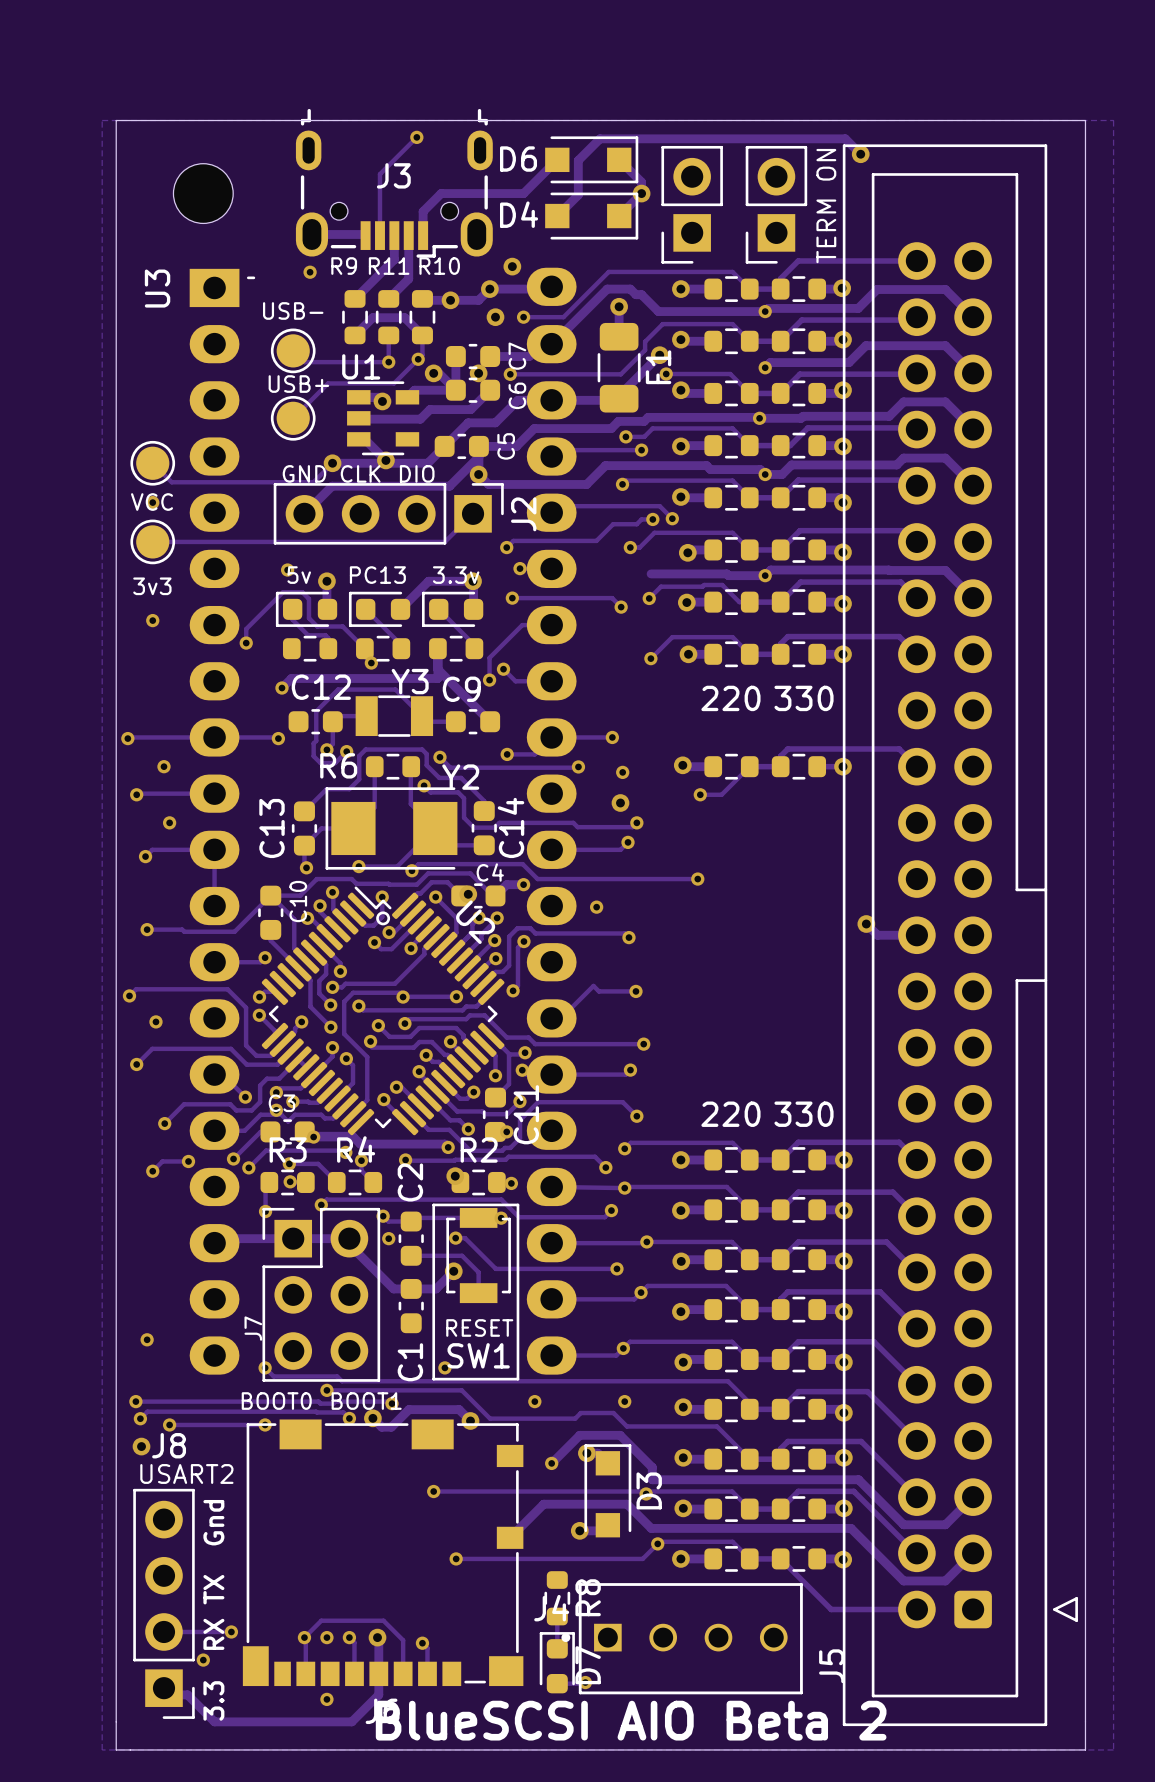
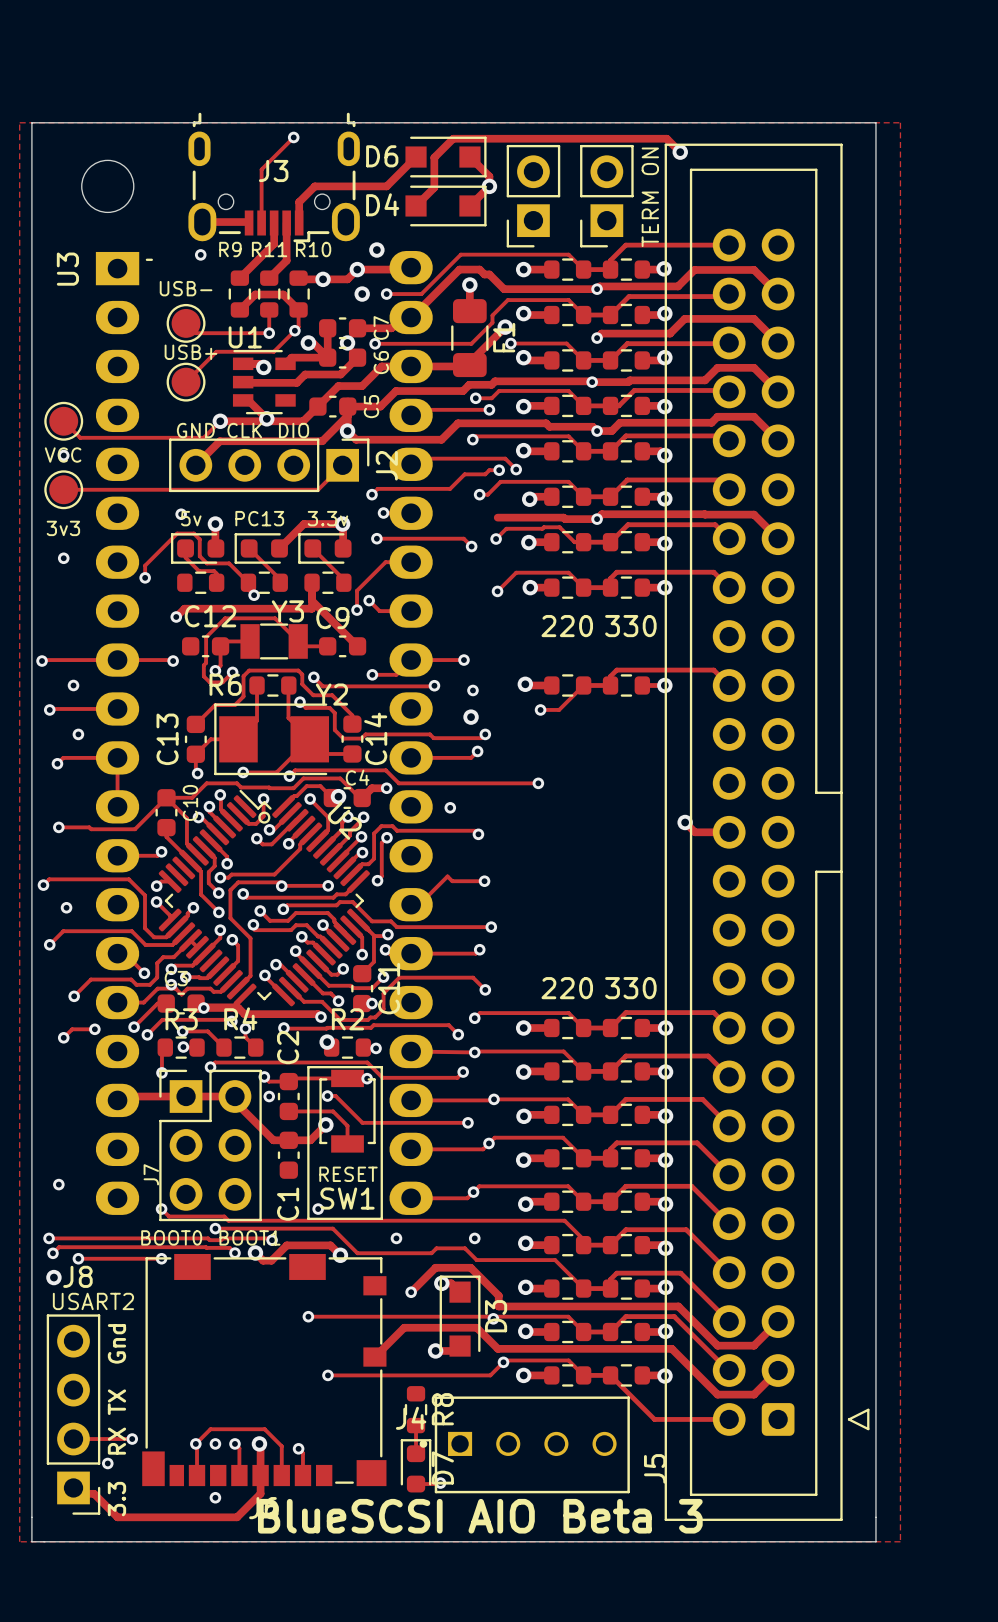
text: BlueSCSI AIO Beta 2 (631, 1720) -> BlueSCSI AIO Beta 3 (480, 1516)

